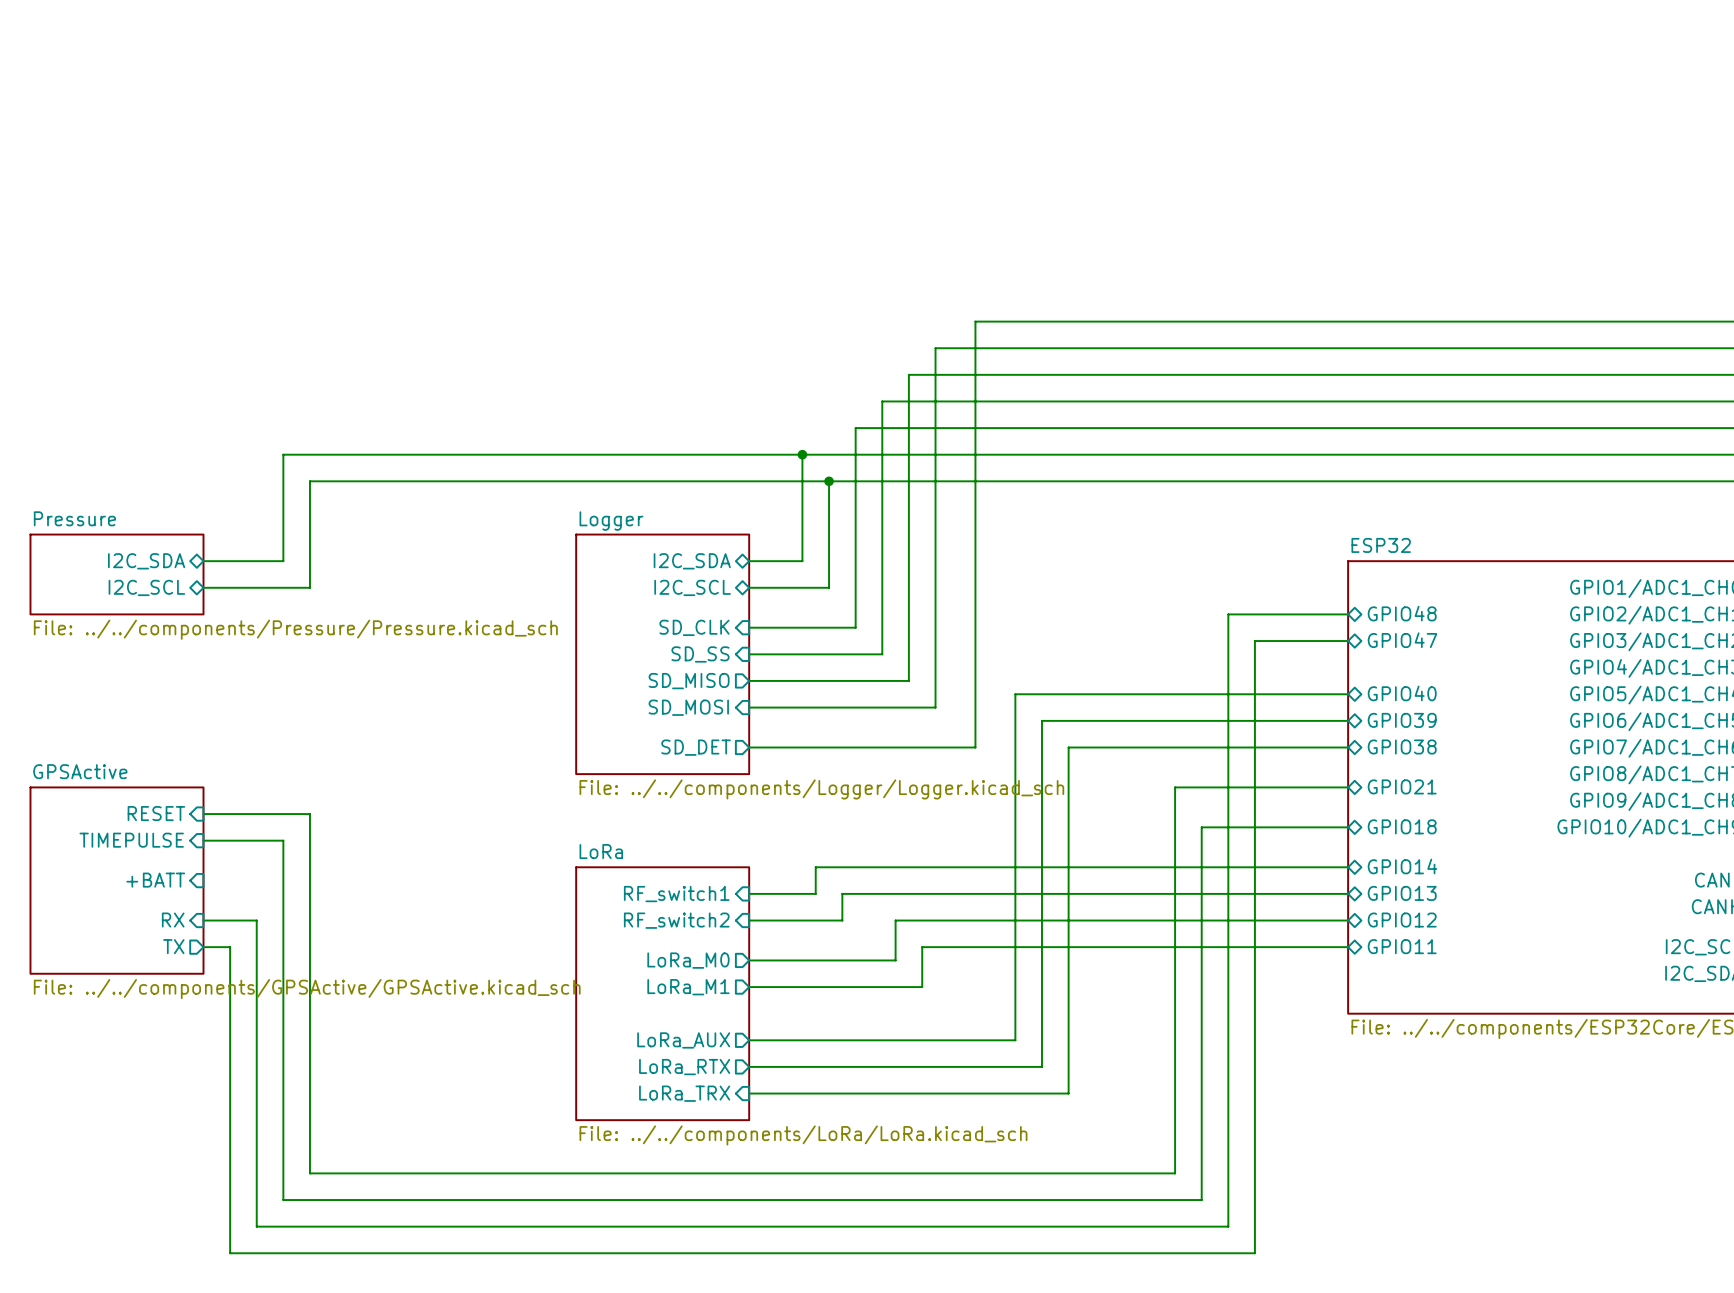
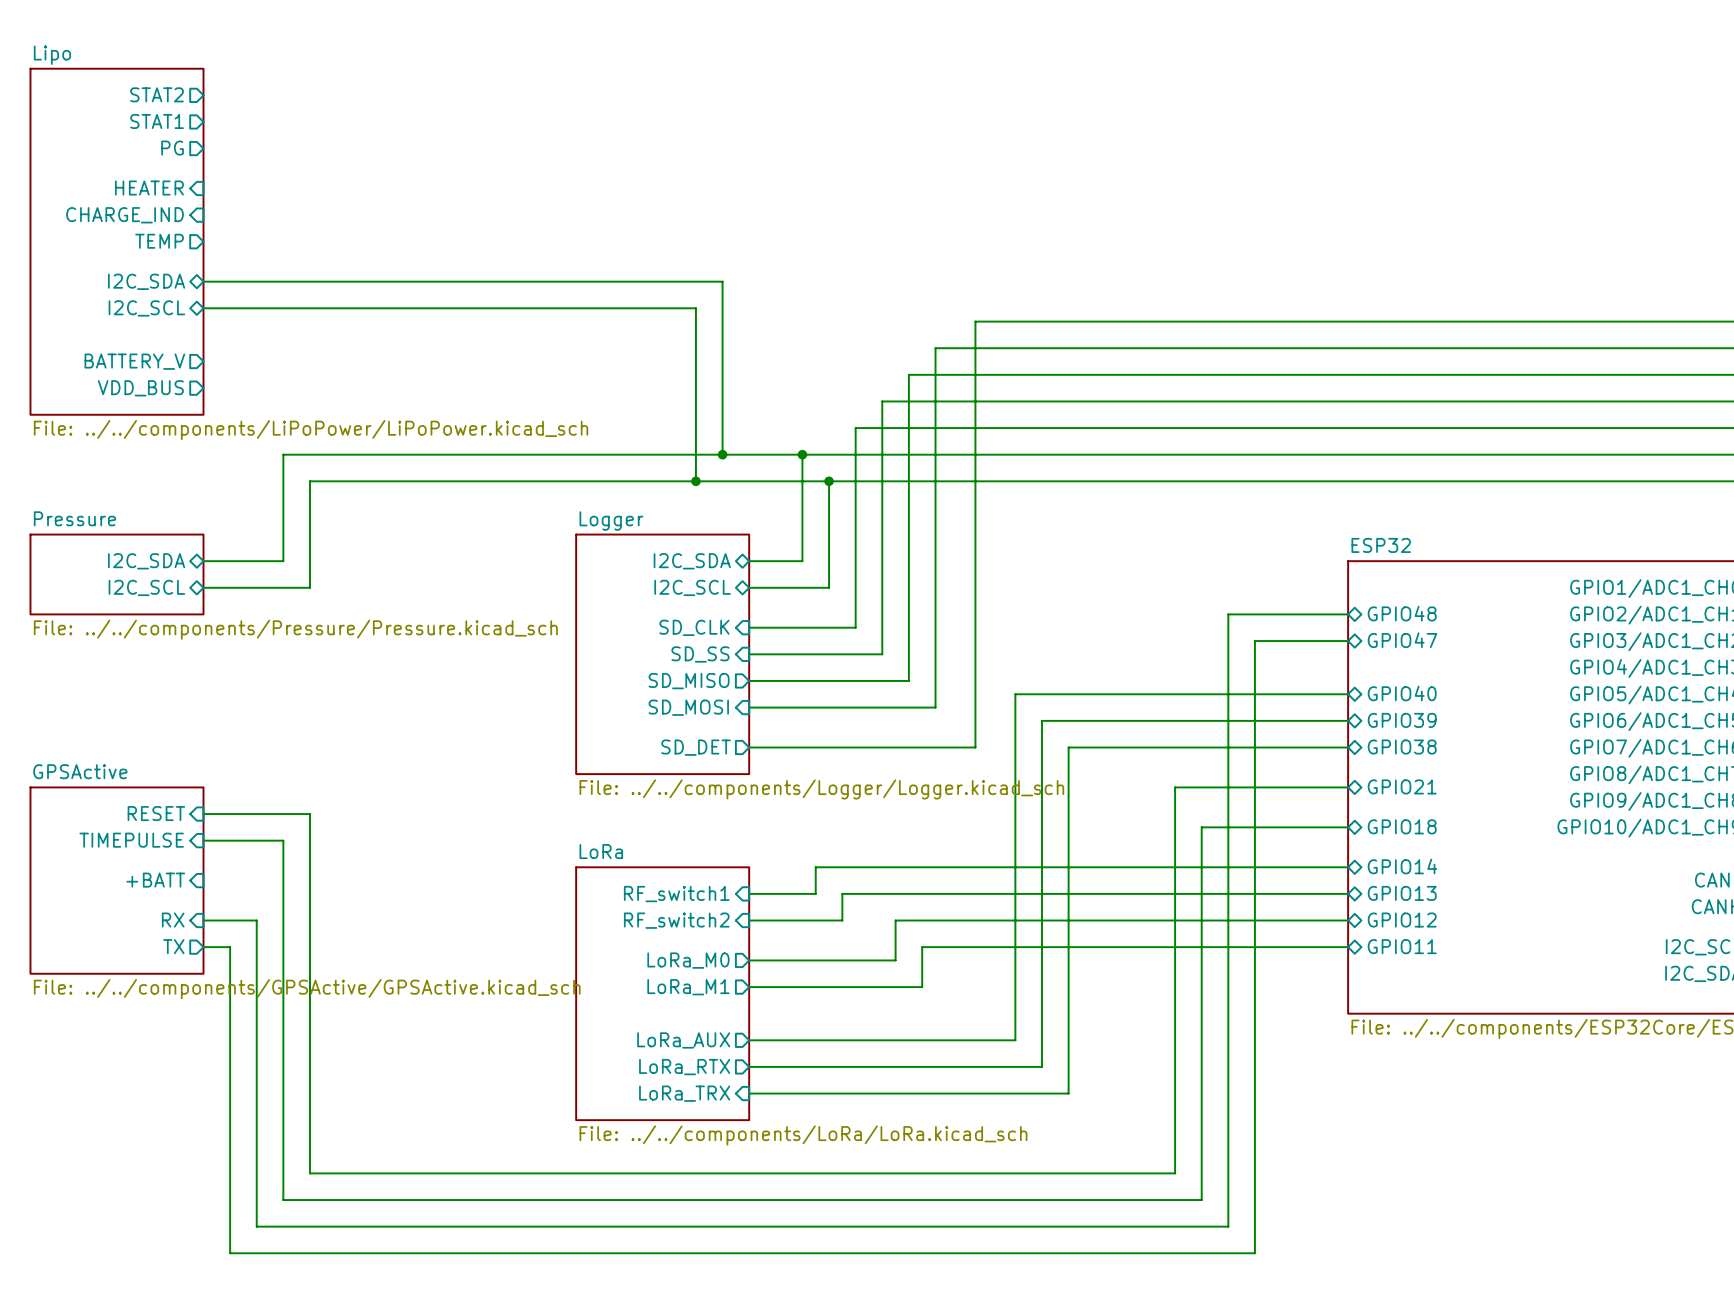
sheet pin: none -> STAT2 (157, 94)
sheet pin: none -> STAT1 (157, 121)
sheet pin: none -> PG (172, 148)
sheet pin: none -> HEATER (149, 188)
sheet pin: none -> CHARGE_IND (125, 215)
sheet Lipo: none -> File: ../../components/LiPoPower/LiPoPower.kicad_sch (116, 241)
sheet pin: none -> TEMP (159, 241)
sheet pin: none -> I2C_SDA (146, 281)
wire: none -> (203, 281) (722, 281) (722, 454)
sheet pin: none -> I2C_SCL (146, 308)
wire: none -> (203, 308) (695, 308) (695, 481)
sheet pin: none -> BATTERY_V (134, 361)
sheet pin: none -> VDD_BUS (140, 388)
junction: none -> (722, 454)
junction: none -> (695, 481)

